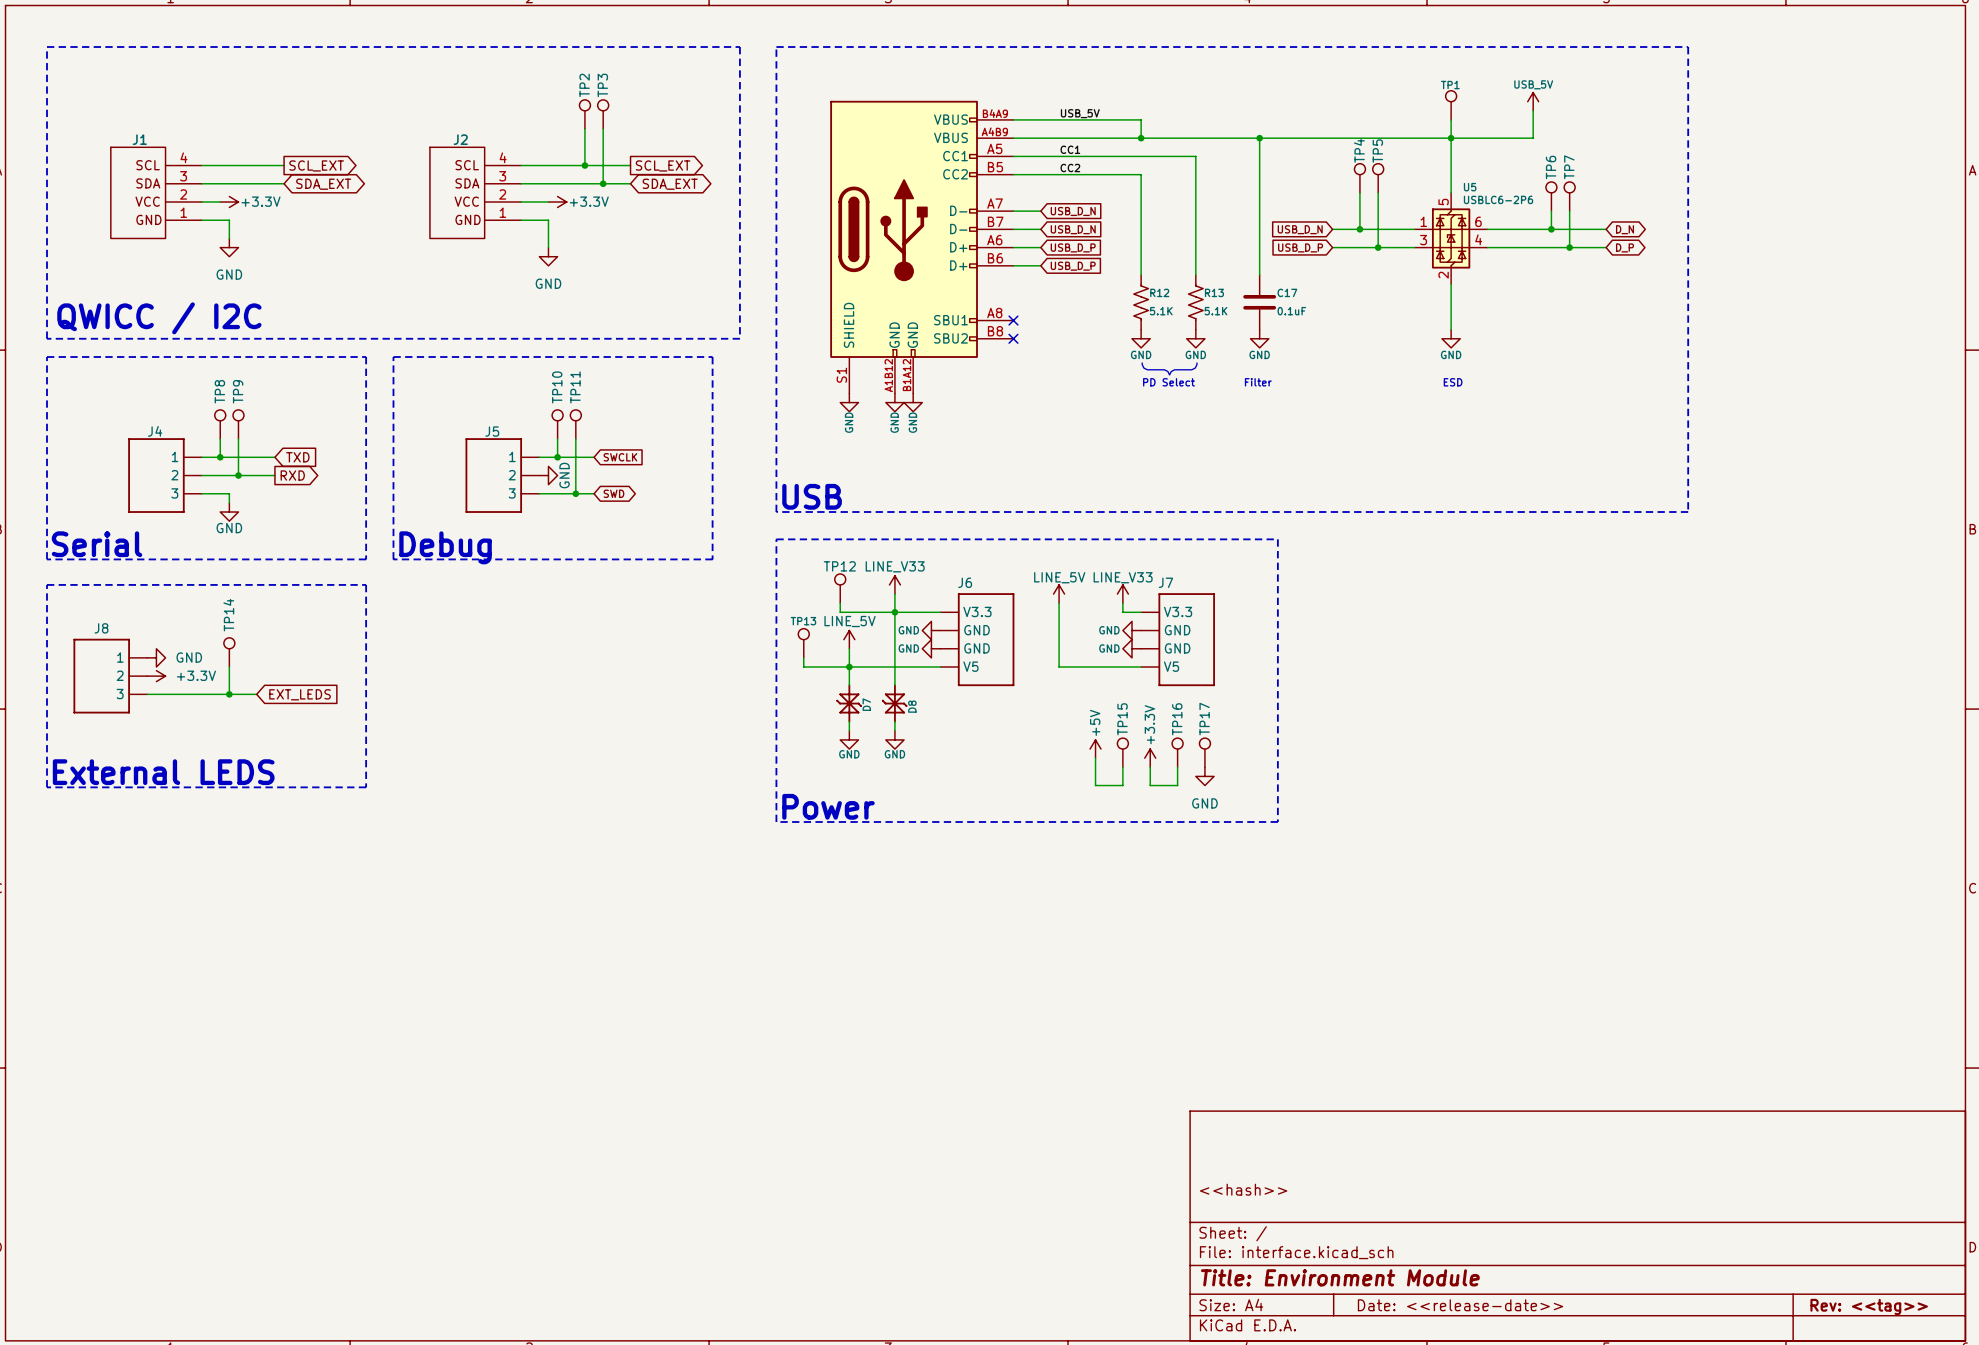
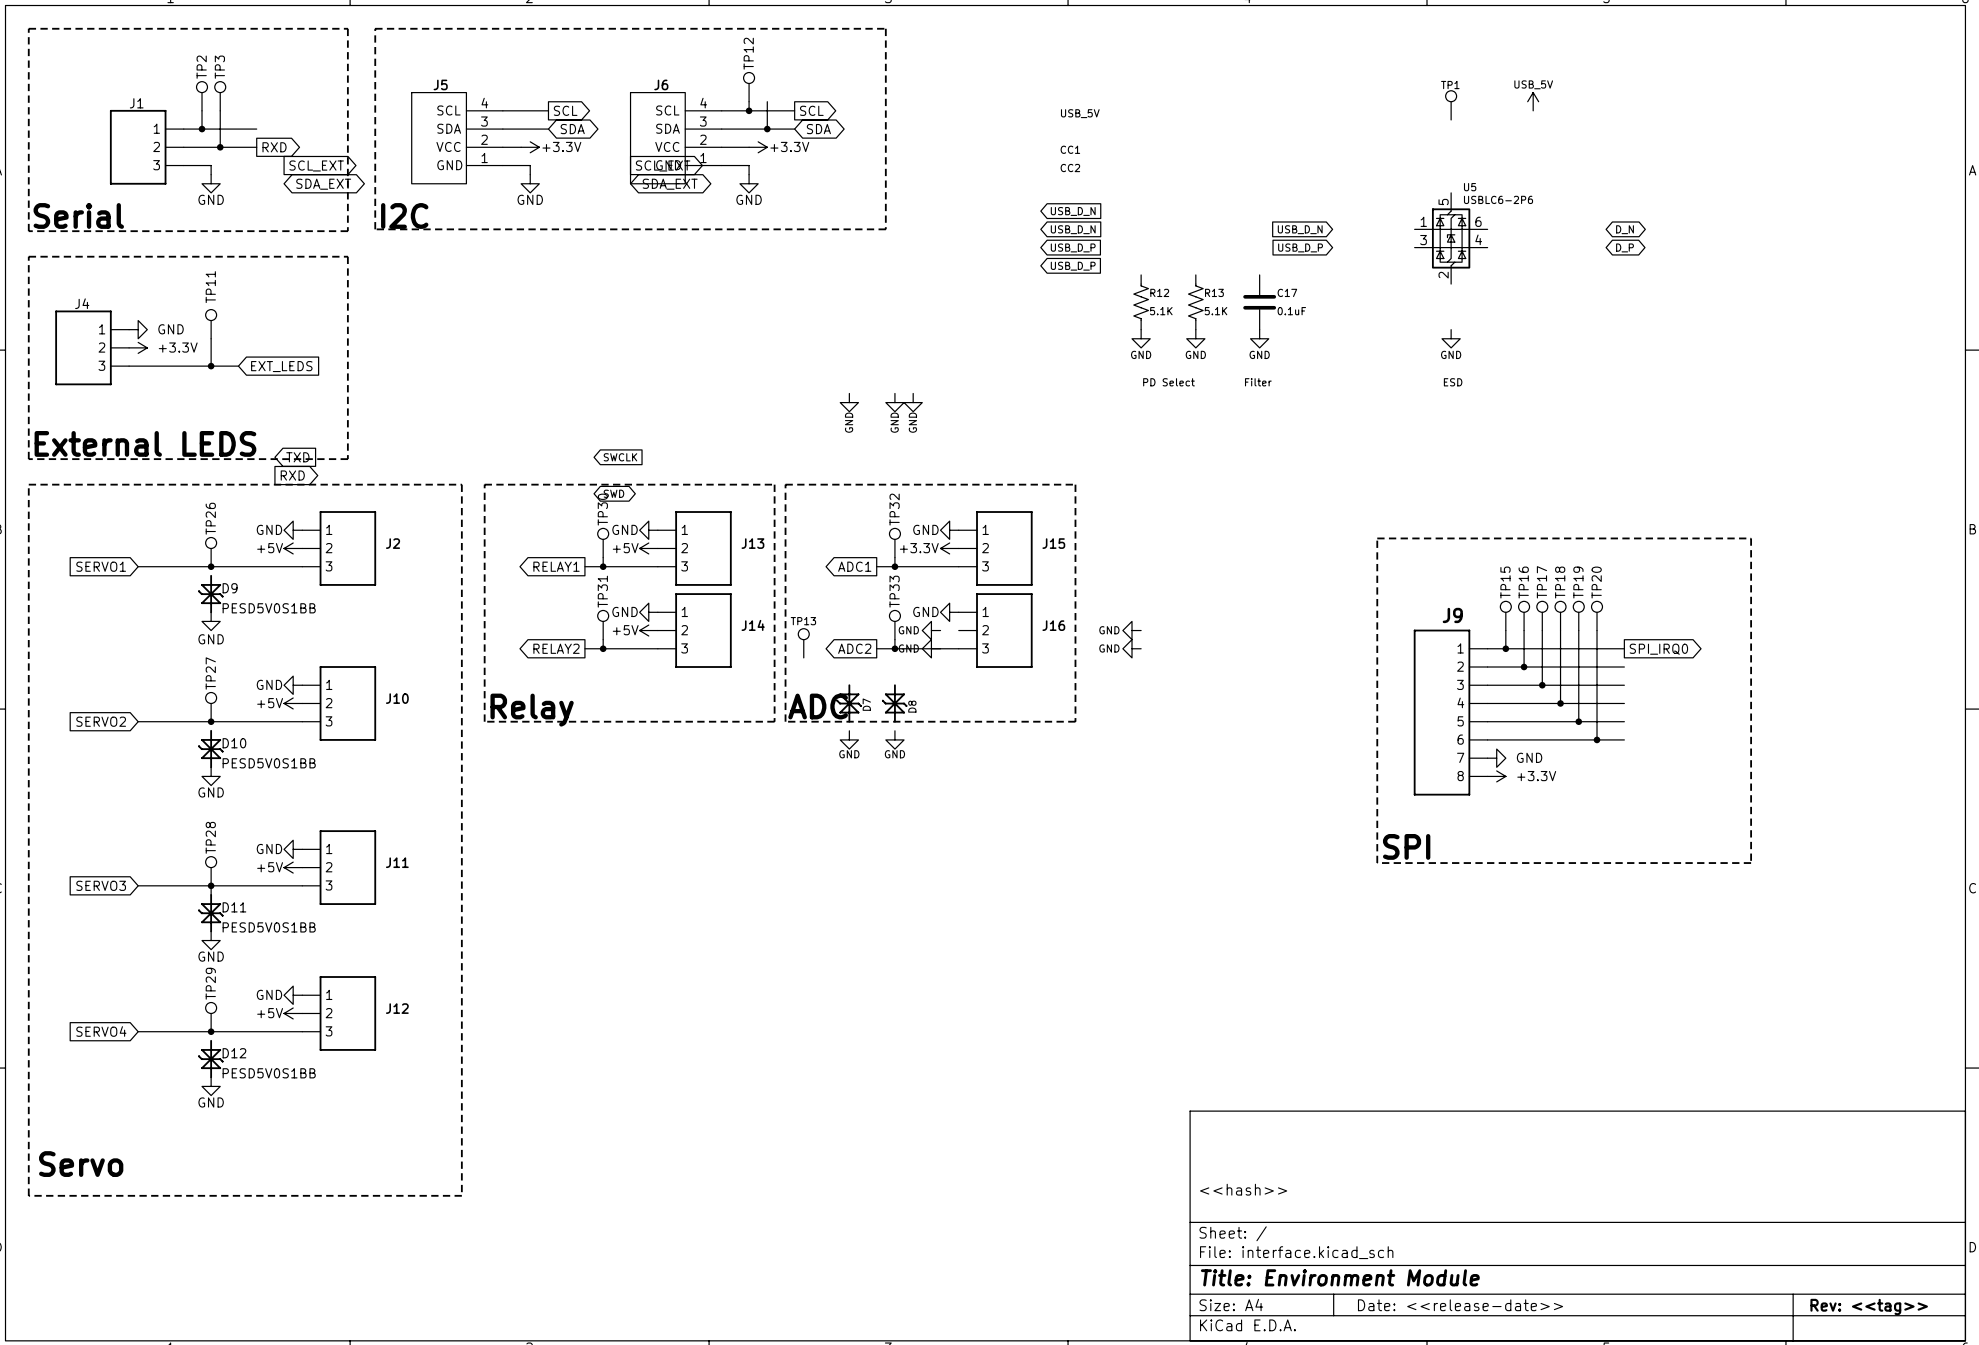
line: none -> (28, 28) (347, 28) (347, 231) (28, 231) (28, 28)
line: none -> (375, 28) (885, 28) (885, 229) (375, 229) (375, 28)
line: (47, 47) (739, 47) (739, 338) (47, 338) (47, 47) -> none
line: (776, 47) (776, 512) (1688, 512) (1688, 47) (776, 47) -> none
wire: none -> (749, 101) (749, 110)
wire: none -> (767, 101) (767, 129)
wire: none -> (202, 110) (202, 129)
wire: none -> (220, 110) (220, 147)
wire: none -> (502, 110) (548, 110)
global label: none -> SCL (565, 110)
wire: none -> (721, 110) (794, 110)
junction: none -> (749, 110)
global label: none -> SCL (811, 110)
wire: (1533, 110) (1533, 138) (1013, 138) -> none
TP2 position: (584, 114) -> (202, 96)
TP3 position: (603, 114) -> (220, 96)
wire: (1013, 119) (1141, 119) (1141, 138) -> none
wire: (1451, 119) (1451, 192) -> none
wire: none -> (183, 129) (256, 129)
junction: none -> (202, 129)
wire: none -> (502, 129) (548, 129)
global label: none -> SDA (572, 129)
wire: (584, 129) (584, 165) -> none
wire: (603, 129) (603, 183) -> none
wire: none -> (721, 129) (794, 129)
junction: none -> (767, 129)
global label: none -> SDA (818, 129)
junction: (1141, 138) -> none
wire: (1259, 138) (1259, 274) -> none
junction: (1259, 138) -> none
junction: (1451, 138) -> none
J2 name position: J2 (460, 139) -> J2 (393, 543)
J1 symbol: [110, 147, 203, 239] -> [109, 109, 184, 185]
wire: none -> (183, 147) (256, 147)
junction: none -> (220, 147)
global label: none -> RXD (274, 147)
J2 symbol: [429, 147, 522, 239] -> [302, 511, 377, 586]
wire: none -> (502, 147) (521, 147)
wire: none -> (721, 147) (749, 147)
power symbol: none -> +3.3V (758, 147)
wire: (1013, 156) (1195, 156) (1195, 274) -> none
wire: (211, 165) (284, 165) -> (211, 165) (211, 174)
wire: (530, 165) (630, 165) -> (530, 165) (530, 174)
junction: (584, 165) -> none
wire: none -> (721, 165) (749, 165) (749, 174)
wire: (1013, 174) (1141, 174) (1141, 274) -> none
TP4: (1359, 178) -> none
TP5: (1378, 178) -> none
wire: (202, 183) (284, 183) -> none
power symbol: none -> GND (211, 183)
wire: (521, 183) (630, 183) -> none
junction: (603, 183) -> none
power symbol: none -> GND (749, 183)
wire: (1359, 192) (1359, 229) -> none
wire: (1378, 192) (1378, 247) -> none
TP6: (1551, 196) -> none
TP7: (1569, 196) -> none
power symbol: +3.3V (229, 202) -> none
wire: (521, 202) (548, 202) -> none
power symbol position: +3.3V (557, 202) -> +3.3V (530, 147)
wire: (1013, 211) (1040, 211) -> none
wire: (1551, 211) (1551, 229) -> none
wire: (1569, 211) (1569, 247) -> none
text: none -> Serial (78, 215)
text: none -> I2C (404, 215)
wire: (202, 220) (229, 220) (229, 238) -> none
wire: (521, 220) (548, 220) (548, 247) -> none
wire: (1013, 229) (1040, 229) -> none
wire: (1332, 229) (1414, 229) -> none
junction: (1359, 229) -> none
wire: (1487, 229) (1606, 229) -> none
junction: (1551, 229) -> none
power symbol: GND (229, 247) -> none
part: (921, 247) -> none
wire: (1013, 247) (1040, 247) -> none
wire: (1332, 247) (1414, 247) -> none
junction: (1378, 247) -> none
wire: (1487, 247) (1606, 247) -> none
junction: (1569, 247) -> none
power symbol position: GND (548, 256) -> GND (530, 183)
wire: (1013, 265) (1040, 265) -> none
power symbol text position: GND (548, 283) -> GND (530, 199)
wire: (1451, 284) (1451, 329) -> none
text: QWICC / I2C (159, 318) -> none
no-connect mark: (1013, 320) -> none
power symbol: none -> GND (138, 329)
wire: none -> (211, 338) (211, 366)
no-connect mark: (1013, 338) -> none
power symbol: none -> +3.3V (138, 347)
line: (47, 357) (47, 559) (366, 559) (366, 357) (47, 357) -> (28, 256) (28, 459) (347, 459) (347, 256) (28, 256)
line: (393, 357) (712, 357) (712, 559) (393, 559) (393, 357) -> none
wire: none -> (129, 366) (238, 366)
junction: none -> (211, 366)
global label: none -> EXT_LEDS (281, 366)
text: { (1169, 368) -> none
TP8: (220, 424) -> none
TP9: (238, 424) -> none
TP10: (557, 424) -> none
TP11 position: (575, 424) -> (211, 324)
J5 symbol: [465, 438, 540, 513] -> [411, 92, 503, 184]
wire: (238, 439) (238, 475) -> none
wire: (557, 439) (557, 457) -> none
wire: (575, 439) (575, 493) -> none
text: none -> External LEDS (145, 443)
wire: (202, 457) (274, 457) -> none
junction: (220, 457) -> none
wire: (539, 457) (594, 457) -> none
junction: (557, 457) -> none
J4 position: (165, 475) -> (92, 347)
wire: (202, 475) (274, 475) -> none
junction: (238, 475) -> none
power symbol: GND (548, 475) -> none
line: none -> (28, 484) (461, 484) (461, 1195) (28, 1195) (28, 484)
line: none -> (484, 484) (774, 484) (774, 721) (484, 721) (484, 484)
line: none -> (785, 484) (1075, 484) (1075, 721) (785, 721) (785, 484)
wire: (202, 493) (229, 493) (229, 502) -> none
wire: (539, 493) (594, 493) -> none
junction: (575, 493) -> none
text: USB (812, 496) -> none
power symbol: GND (229, 512) -> none
power symbol: none -> GND (293, 530)
power symbol: none -> GND (648, 530)
power symbol: none -> GND (949, 530)
line: none -> (1377, 538) (1751, 538) (1751, 863) (1377, 863) (1377, 538)
line: (776, 539) (1277, 539) (1277, 822) (776, 822) (776, 539) -> none
TP30: none -> (603, 543)
TP32: none -> (894, 543)
text: Serial (97, 544) -> none
text: Debug (445, 547) -> none
power symbol: none -> +5V (293, 548)
power symbol: none -> +5V (648, 548)
J13: none -> (694, 548)
power symbol: none -> +3.3V (949, 548)
J15: none -> (995, 548)
TP26: none -> (211, 552)
wire: none -> (603, 557) (603, 566)
global label: none -> SERVO1 (101, 566)
wire: none -> (138, 566) (302, 566)
junction: none -> (211, 566)
global label: none -> RELAY1 (556, 566)
wire: none -> (584, 566) (657, 566)
junction: none -> (603, 566)
TP12 name rotation: 0° (839, 566) -> 90° counterclockwise (748, 53)
global label: none -> ADC1 (854, 566)
wire: none -> (876, 566) (958, 566)
junction: none -> (894, 566)
line: (47, 584) (366, 584) (366, 787) (47, 787) (47, 584) -> none
power symbol: LINE_V33 (894, 584) -> none
TP12 position: (840, 588) -> (749, 87)
J6 symbol: [940, 593, 1015, 687] -> [630, 92, 722, 184]
D9: none -> PESD5V0S1BB (210, 594)
power symbol: LINE_5V (1059, 594) -> none
power symbol: LINE_V33 (1122, 594) -> none
wire: (840, 603) (840, 612) (940, 612) -> none
wire: (1059, 603) (1059, 667) (1141, 667) -> none
wire: (1122, 603) (1122, 612) (1141, 612) -> none
power symbol: none -> GND (648, 612)
junction: (894, 612) -> none
power symbol: none -> GND (949, 612)
TP18: none -> (1560, 615)
TP19: none -> (1578, 615)
TP20: none -> (1597, 615)
power symbol: none -> GND (211, 621)
TP31: none -> (603, 625)
TP33: none -> (894, 625)
power symbol: none -> +5V (648, 630)
J14: none -> (694, 630)
J16: none -> (995, 630)
wire: none -> (1505, 630) (1505, 648)
wire: none -> (1524, 630) (1524, 667)
wire: none -> (1542, 630) (1542, 685)
wire: none -> (1560, 630) (1560, 703)
wire: none -> (1578, 630) (1578, 721)
wire: none -> (1597, 630) (1597, 739)
wire: none -> (603, 639) (603, 648)
power symbol: LINE_5V (849, 639) -> none
J7: (1178, 639) -> none
global label: none -> RELAY2 (556, 648)
wire: none -> (584, 648) (657, 648)
junction: none -> (603, 648)
wire: (849, 648) (849, 685) -> none
global label: none -> ADC2 (854, 648)
wire: none -> (876, 648) (958, 648)
wire: (894, 648) (894, 685) -> none
junction: none -> (894, 648)
wire: none -> (1487, 648) (1624, 648)
junction: none -> (1505, 648)
global label: none -> SPI_IRQ0 (1658, 649)
TP14: (229, 652) -> none
power symbol: GND (156, 657) -> none
wire: (803, 657) (803, 667) (940, 667) -> none
wire: (229, 667) (229, 694) -> none
junction: (849, 667) -> none
wire: none -> (1487, 667) (1624, 667)
junction: none -> (1524, 667)
J8: (110, 676) -> none
power symbol: +3.3V (156, 676) -> none
power symbol: none -> GND (293, 685)
wire: none -> (1487, 685) (1624, 685)
junction: none -> (1542, 685)
wire: (147, 694) (256, 694) -> none
junction position: (229, 694) -> (211, 721)
global label: EXT_LEDS (300, 694) -> none
power symbol: none -> +5V (293, 703)
J10: none -> (339, 703)
wire: none -> (1487, 703) (1624, 703)
junction: none -> (1560, 703)
text: none -> ADC (818, 706)
TP27: none -> (211, 707)
text: none -> Relay (532, 710)
J9: none -> (1450, 712)
global label: none -> SERVO2 (101, 721)
wire: none -> (138, 721) (302, 721)
wire: (849, 721) (849, 730) -> none
wire: (894, 721) (894, 730) -> (894, 557) (894, 566)
wire: none -> (1487, 721) (1624, 721)
junction: none -> (1578, 721)
wire: none -> (1487, 739) (1624, 739)
junction: none -> (1597, 739)
D10: none -> PESD5V0S1BB (210, 749)
power symbol: +5V (1095, 749) -> none
TP15 position: (1122, 752) -> (1505, 615)
TP16 position: (1177, 752) -> (1524, 615)
TP17 position: (1204, 752) -> (1542, 615)
wire: (1095, 758) (1095, 785) (1122, 785) (1122, 767) -> none
power symbol: +3.3V (1150, 758) -> none
power symbol: none -> GND (1496, 758)
wire: (1150, 767) (1150, 785) (1177, 785) (1177, 767) -> none
text: External LEDS (163, 772) -> none
power symbol: none -> GND (211, 776)
power symbol: GND (1204, 776) -> none
power symbol: none -> +3.3V (1496, 776)
text: Power (828, 806) -> none
text: none -> SPI (1406, 846)
power symbol: none -> GND (293, 849)
power symbol: none -> +5V (293, 867)
J11: none -> (339, 867)
TP28: none -> (211, 871)
global label: none -> SERVO3 (101, 885)
wire: none -> (138, 885) (302, 885)
wire: none -> (211, 885) (211, 894)
junction: none -> (211, 885)
D11: none -> PESD5V0S1BB (210, 913)
power symbol: none -> GND (211, 940)
power symbol: none -> GND (293, 995)
power symbol: none -> +5V (293, 1013)
J12: none -> (339, 1013)
TP29: none -> (211, 1017)
global label: none -> SERVO4 (101, 1031)
wire: none -> (138, 1031) (302, 1031)
junction: none -> (211, 1031)
D12: none -> PESD5V0S1BB (210, 1059)
power symbol: none -> GND (211, 1086)
text: none -> Servo (81, 1164)

